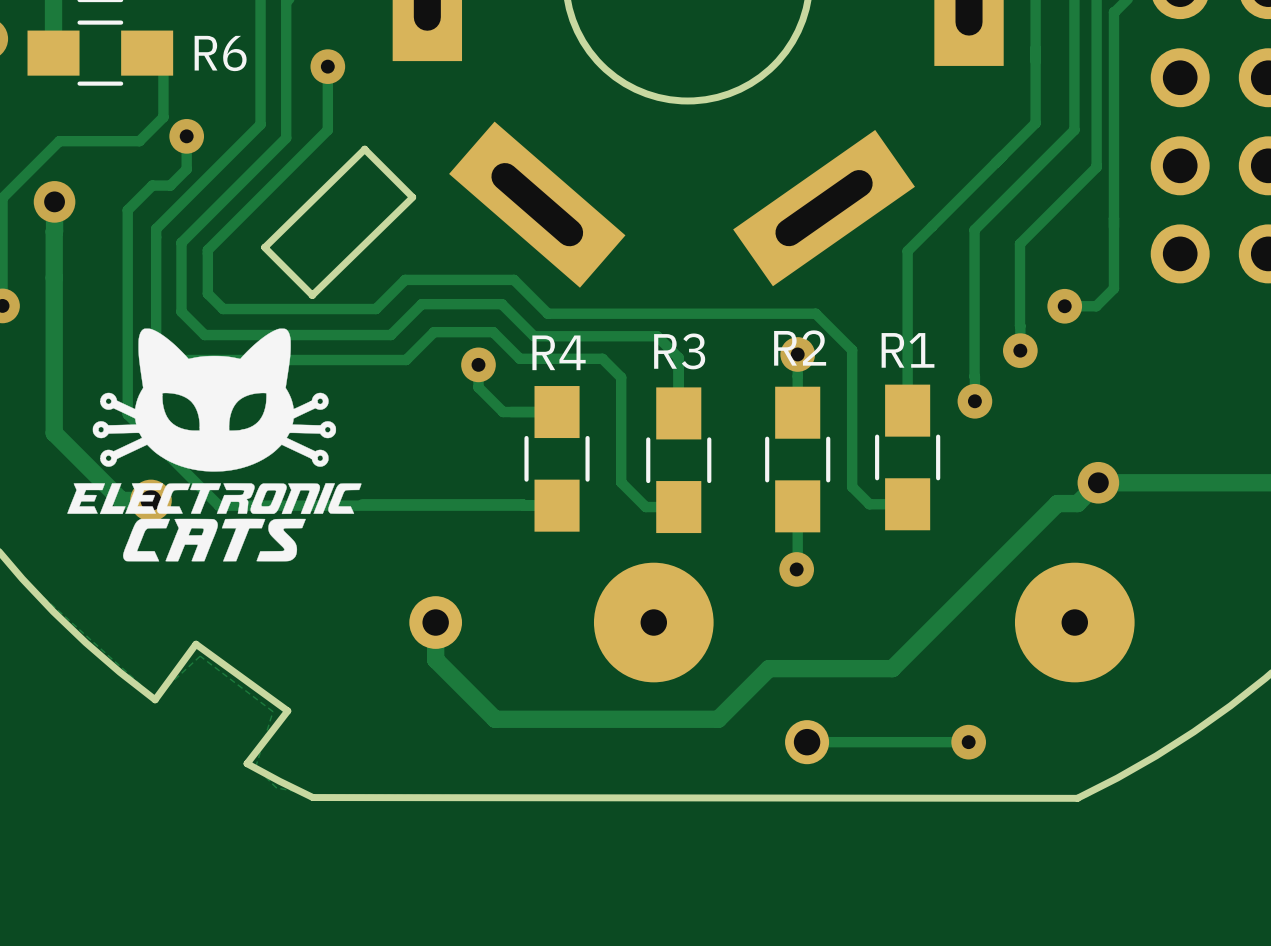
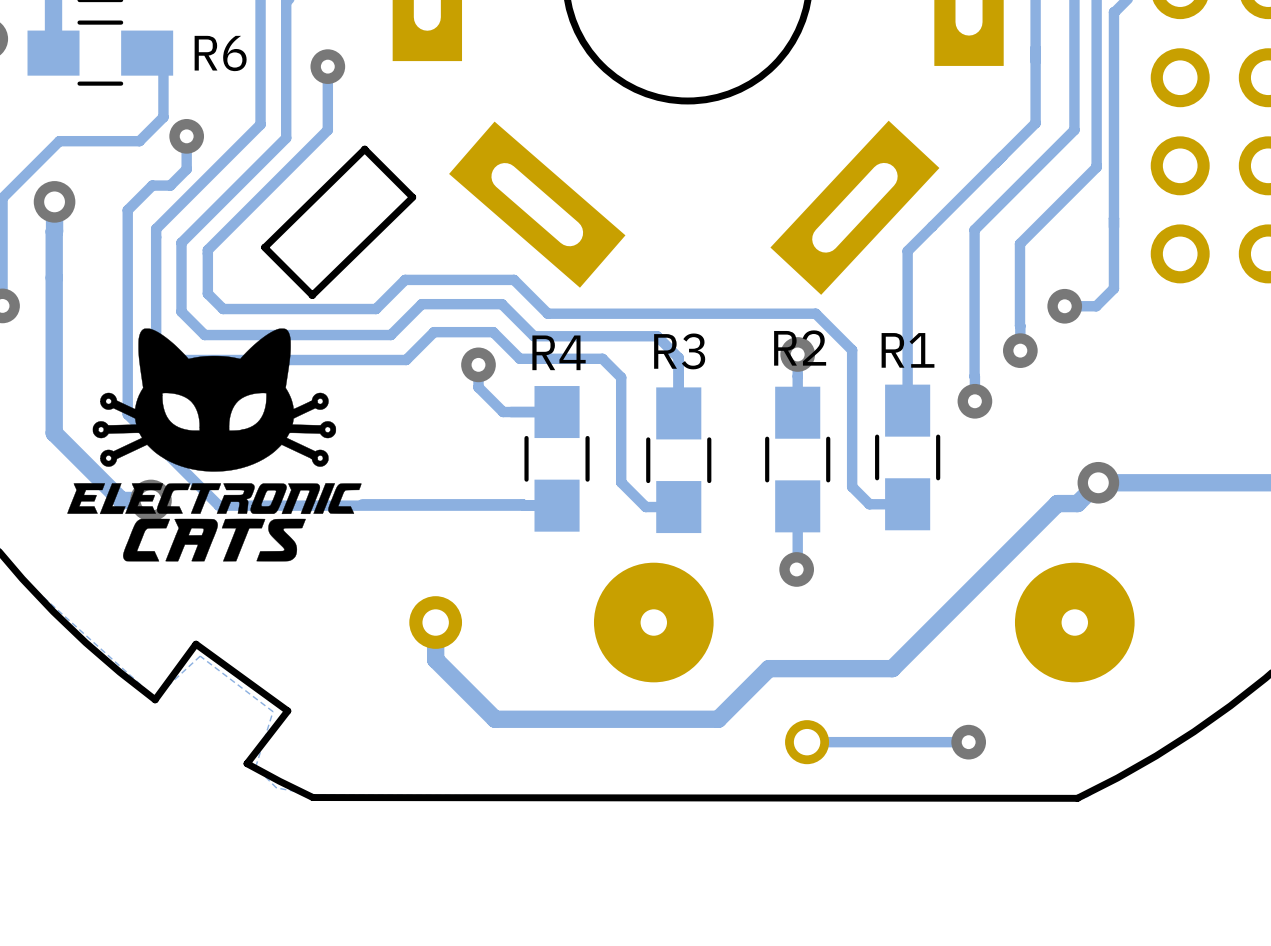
part rotation: 0° (824, 208) -> 12° counterclockwise (854, 207)

